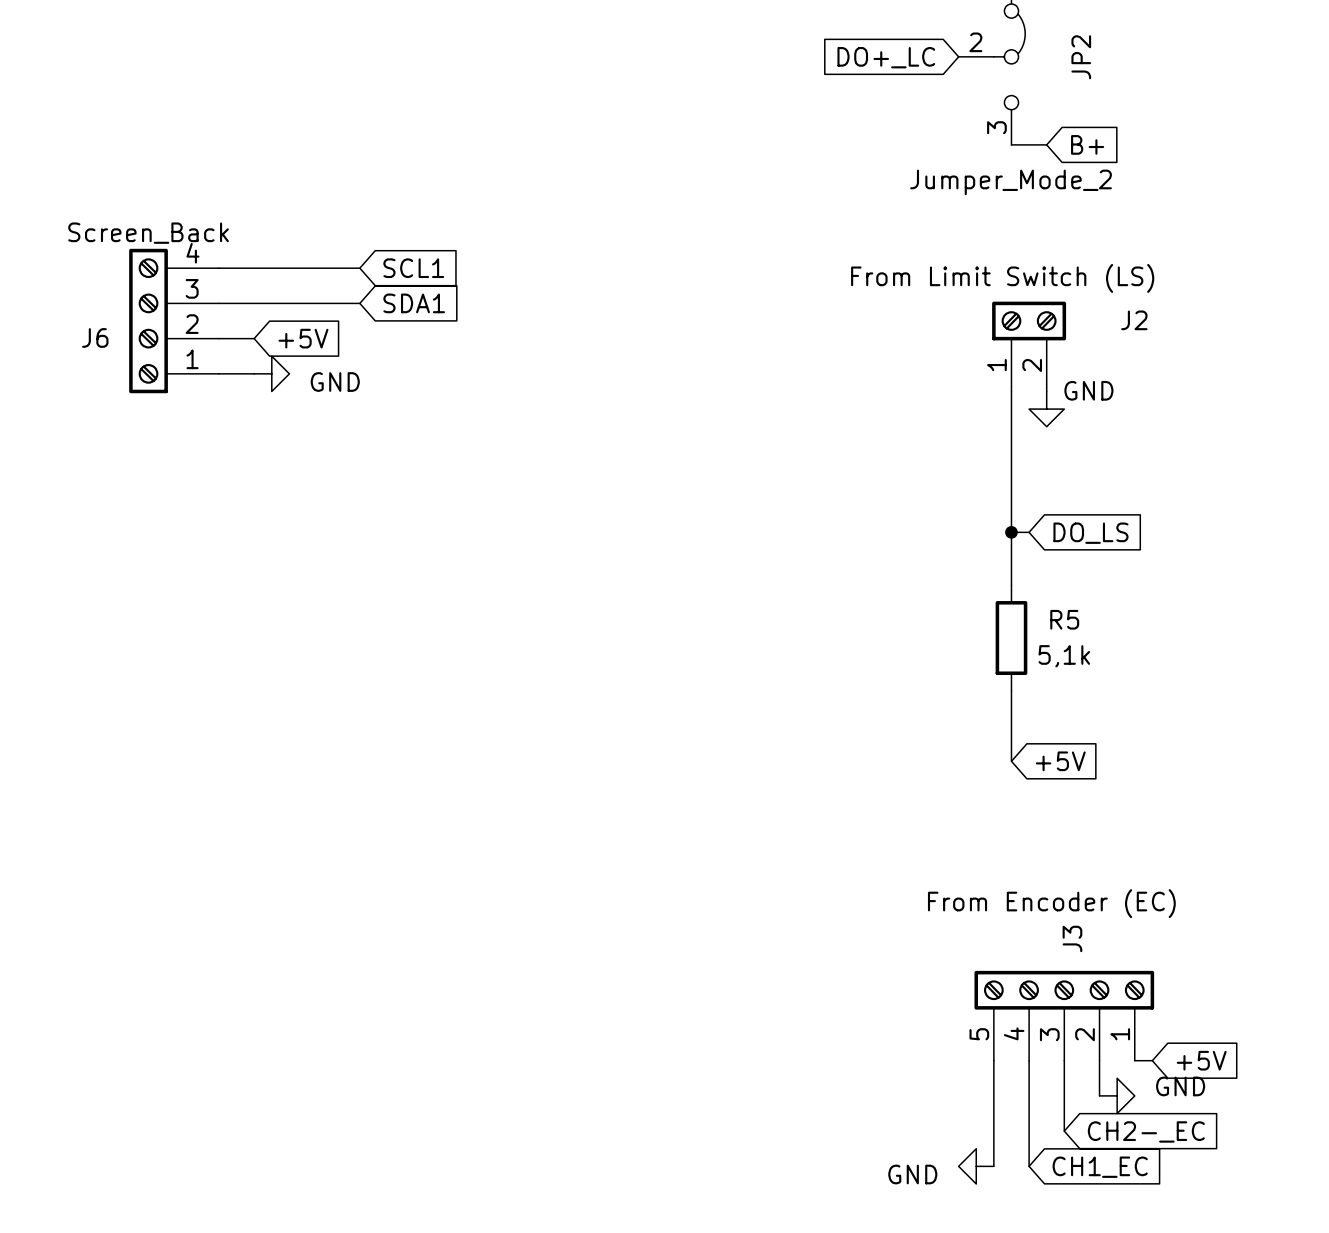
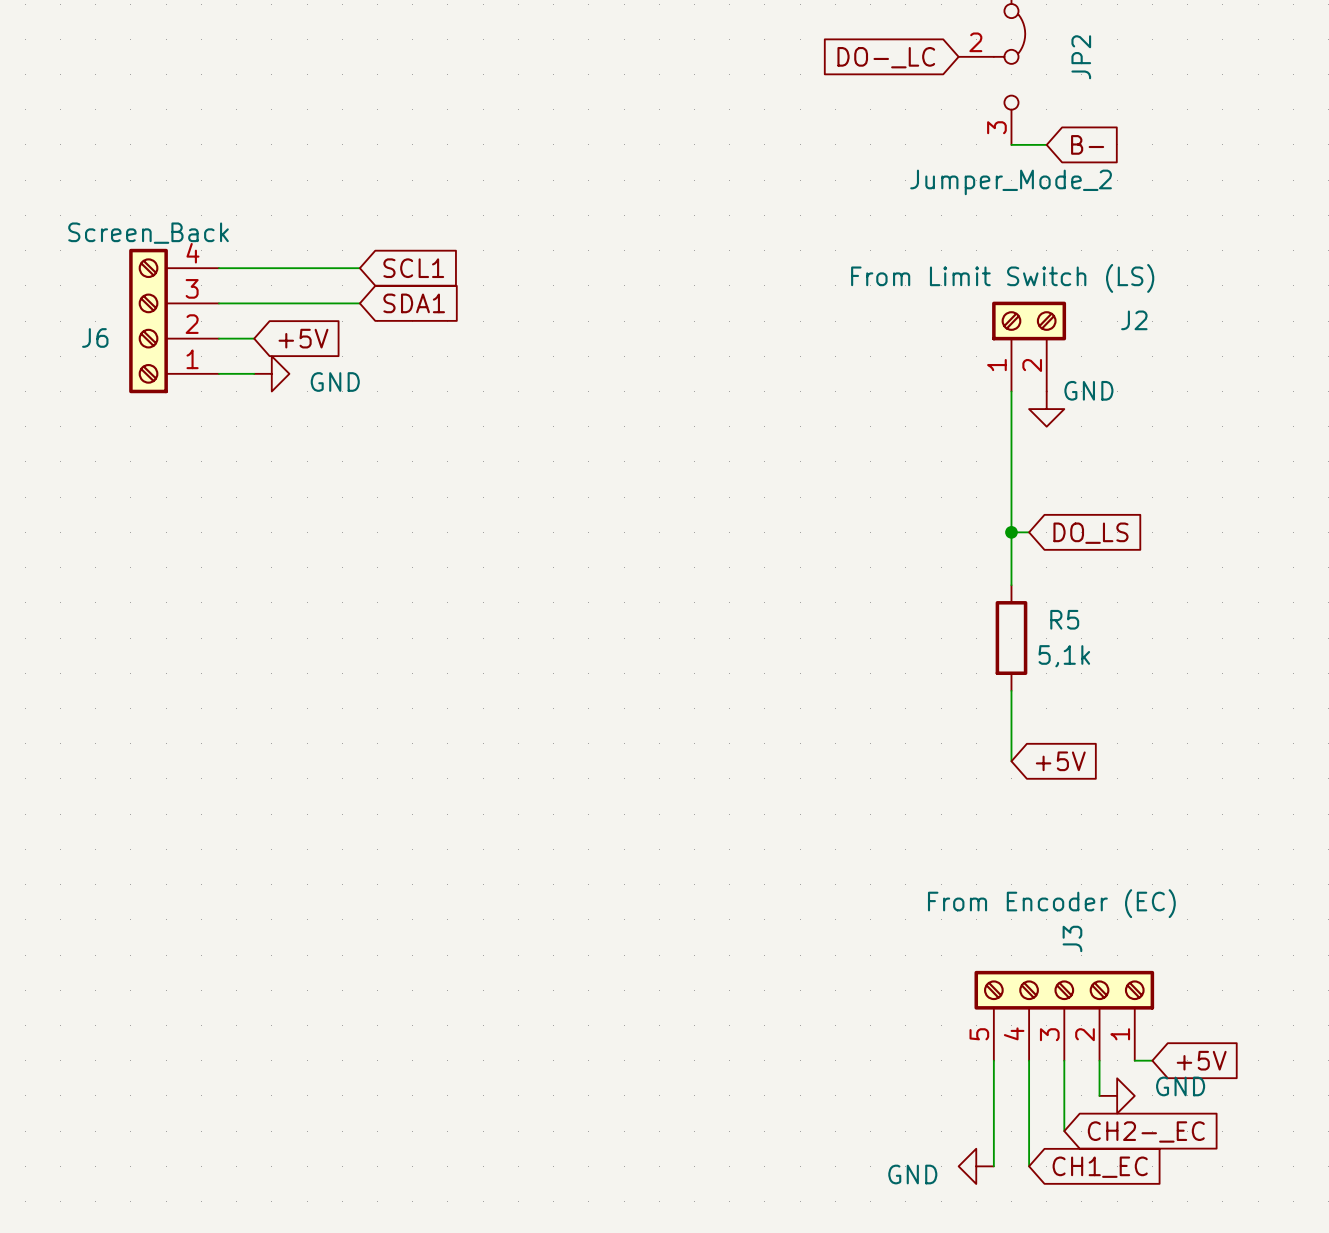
global label: DO+_LC (886, 57) -> DO-_LC (886, 57)
global label: B+ (1087, 144) -> B- (1087, 144)

